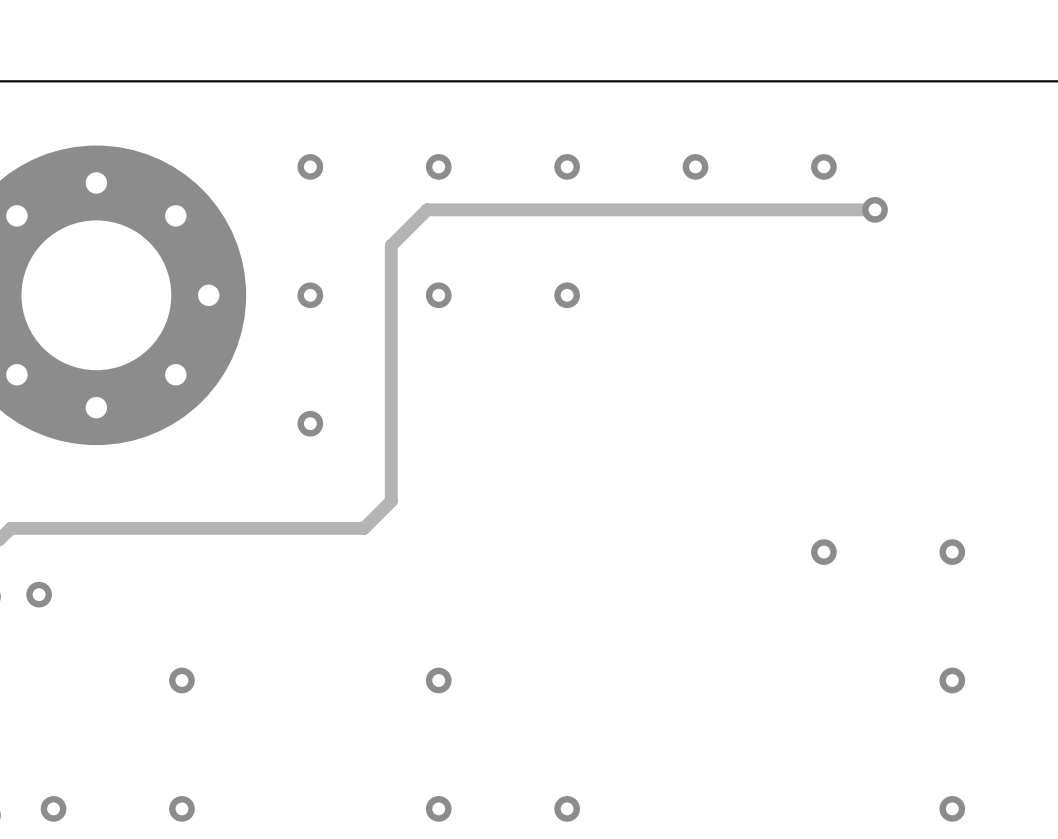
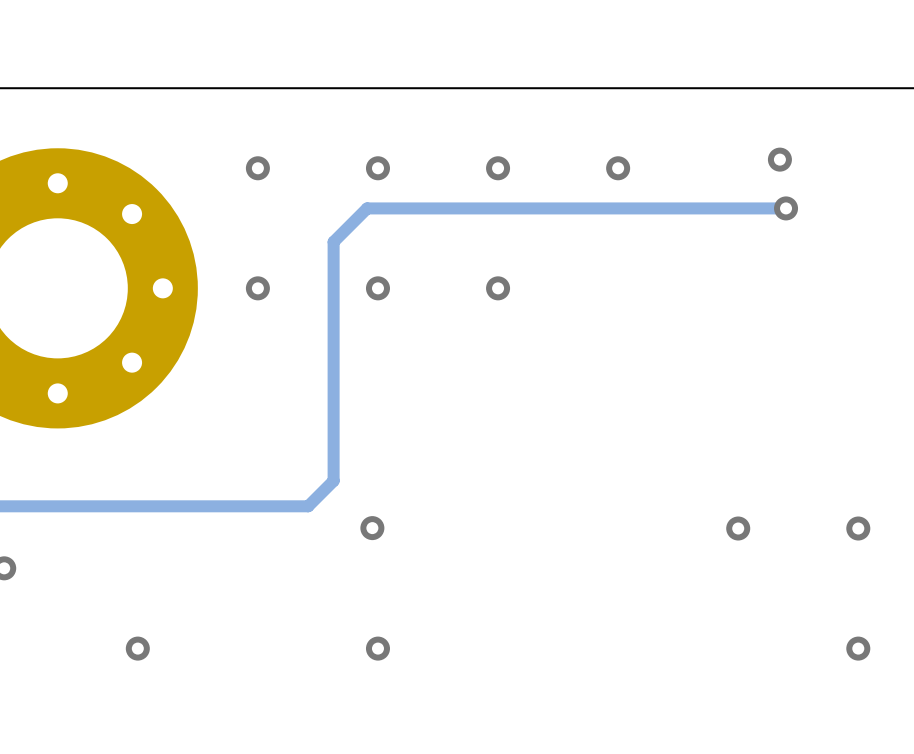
via position: (823, 166) -> (779, 159)
via position: (310, 423) -> (372, 528)

